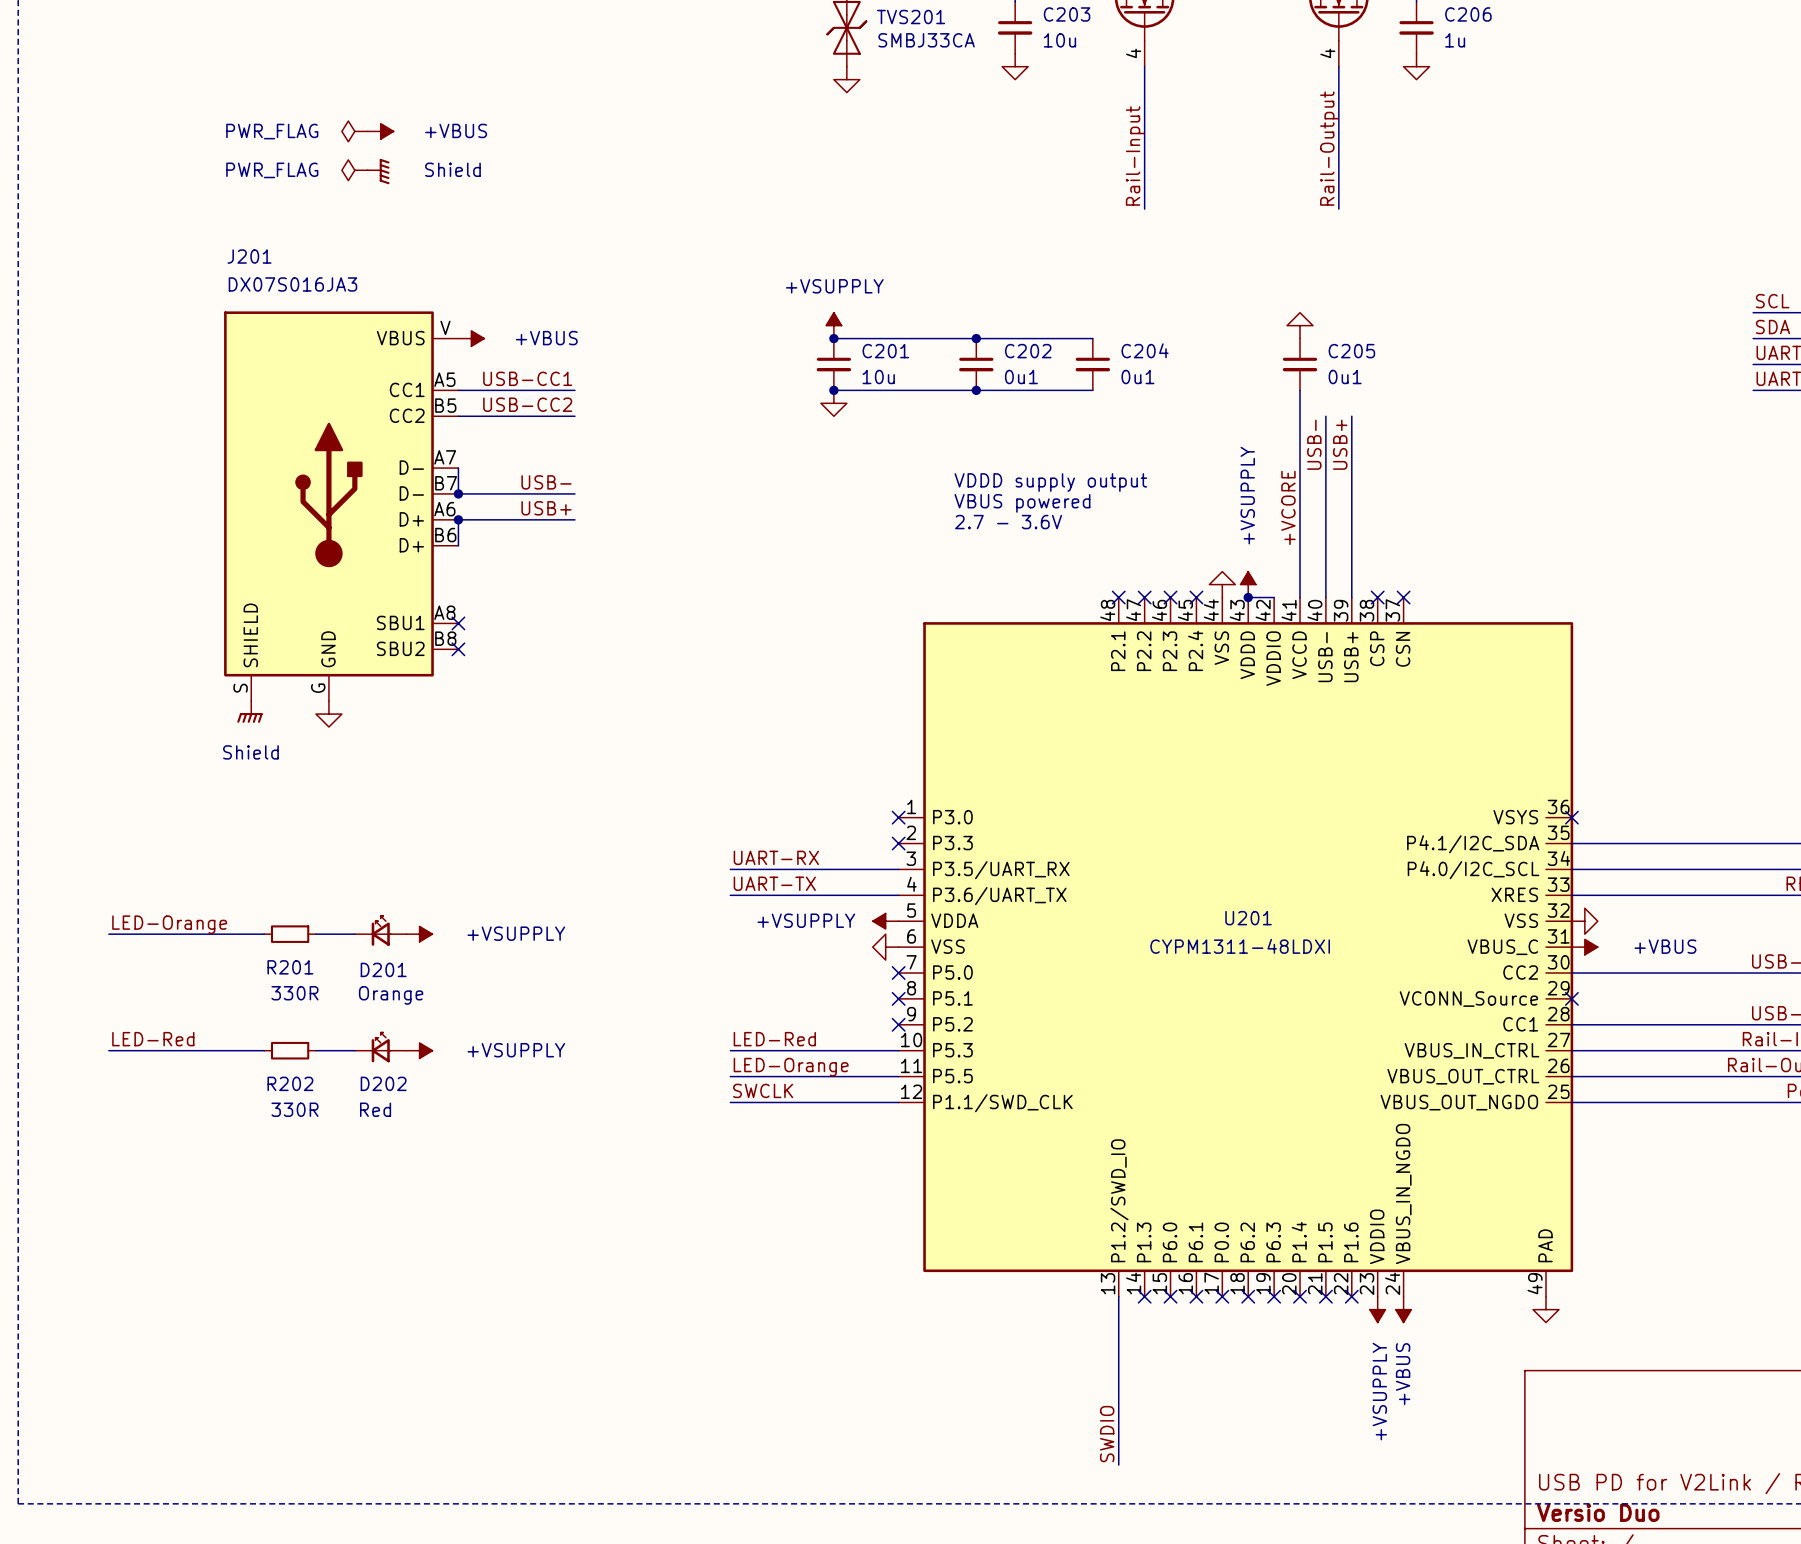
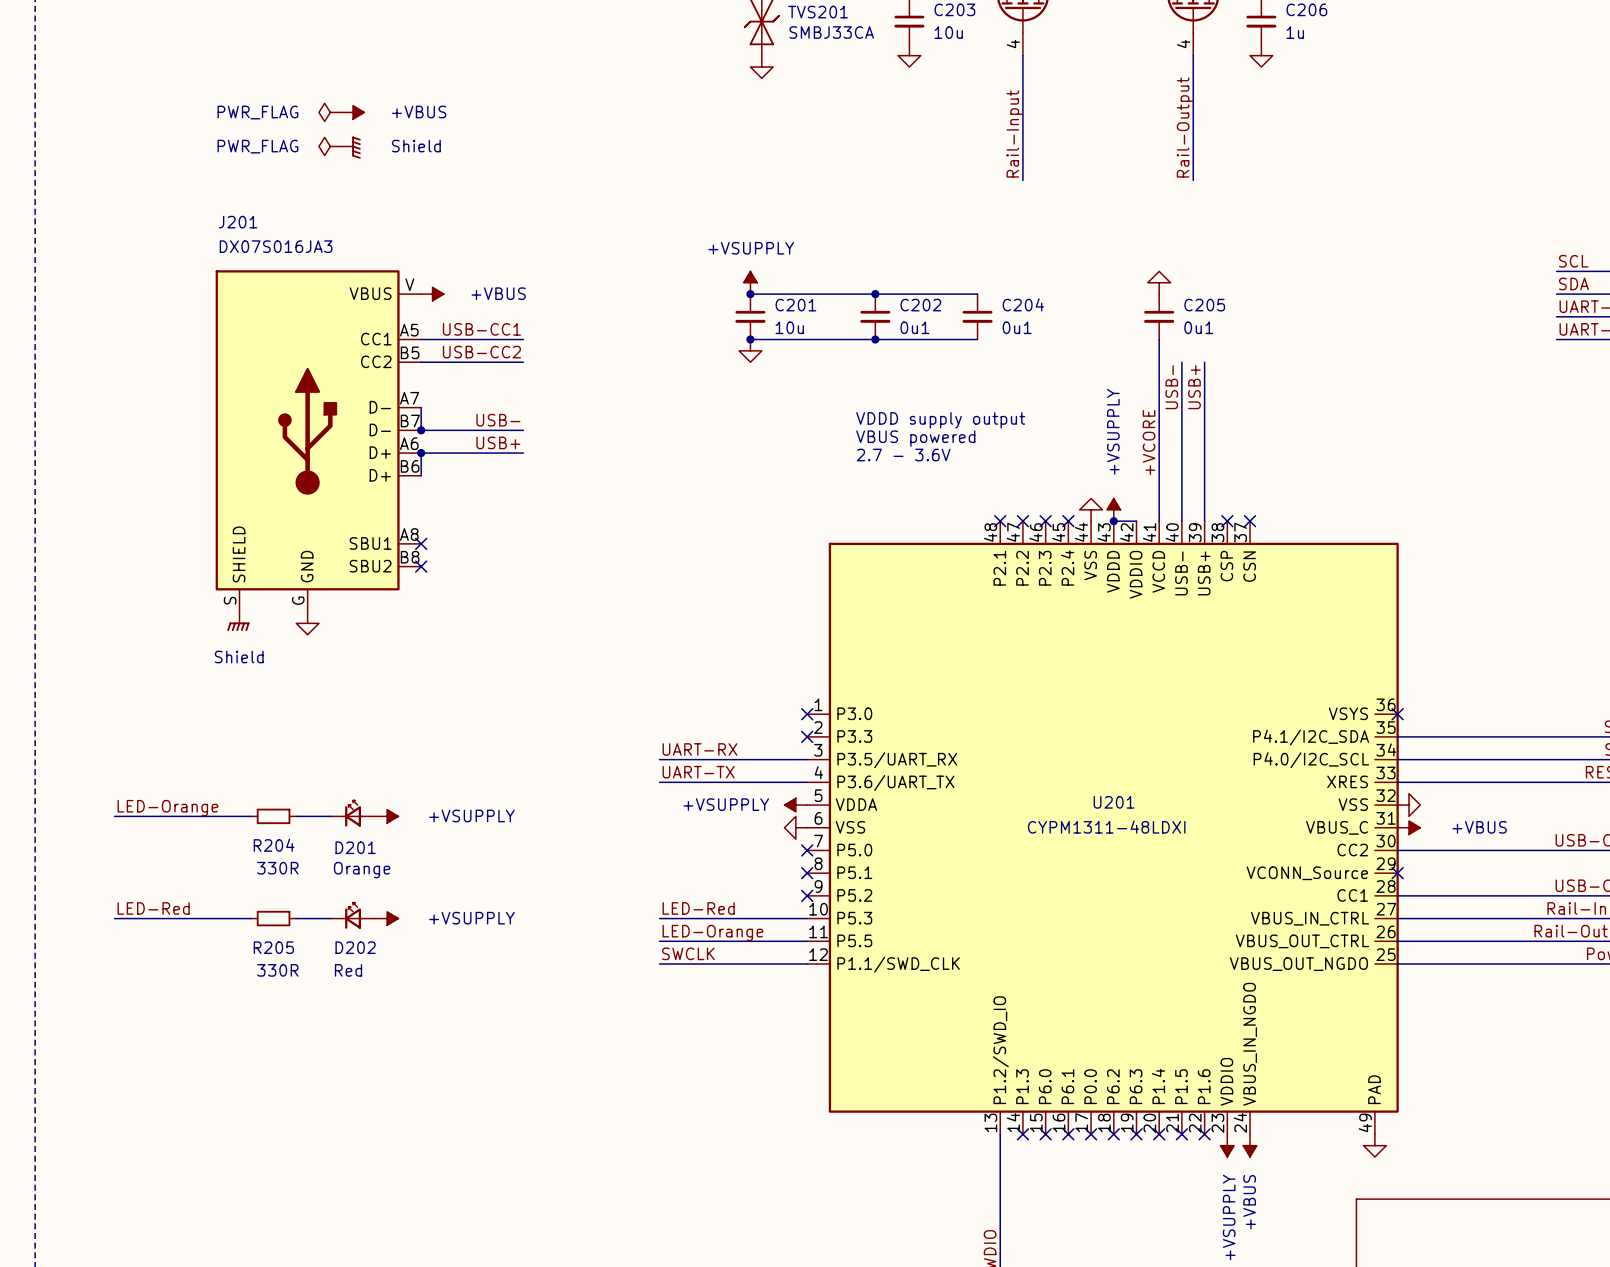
R201 name: R201 (290, 967) -> R204 (274, 845)
R202 name: R202 (290, 1083) -> R205 (273, 947)

